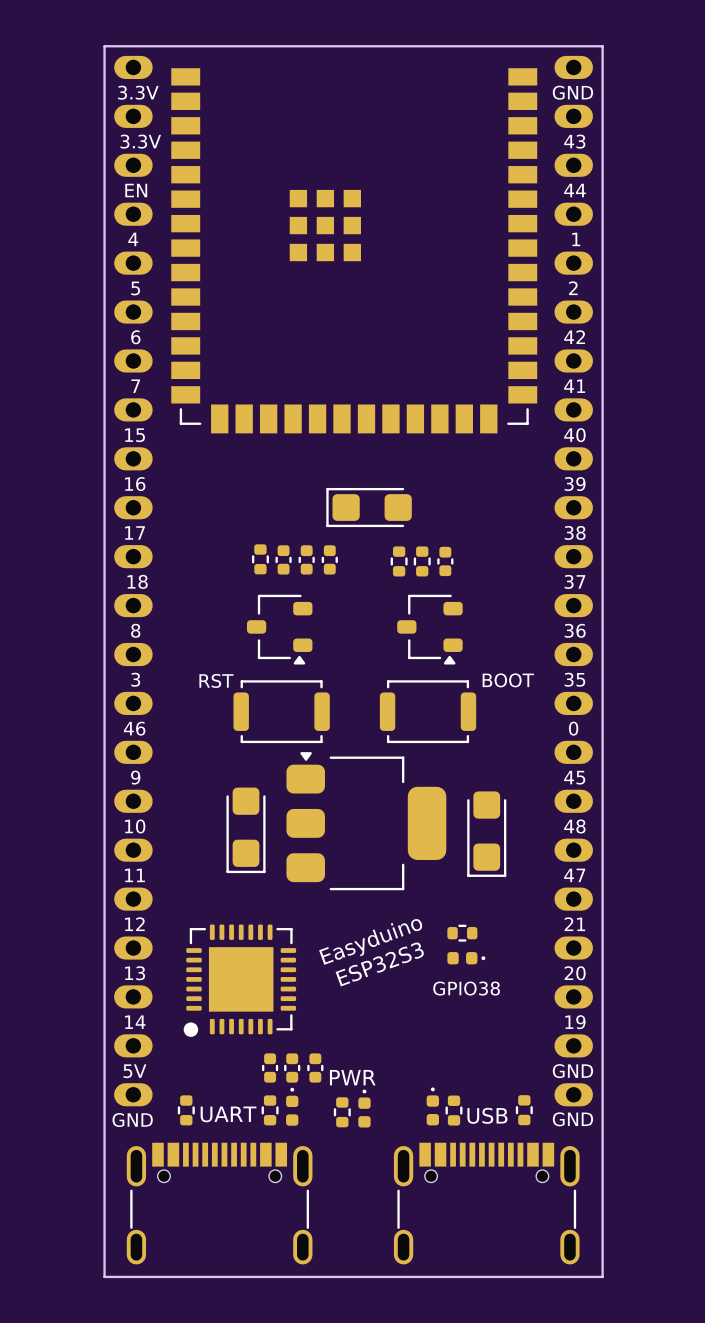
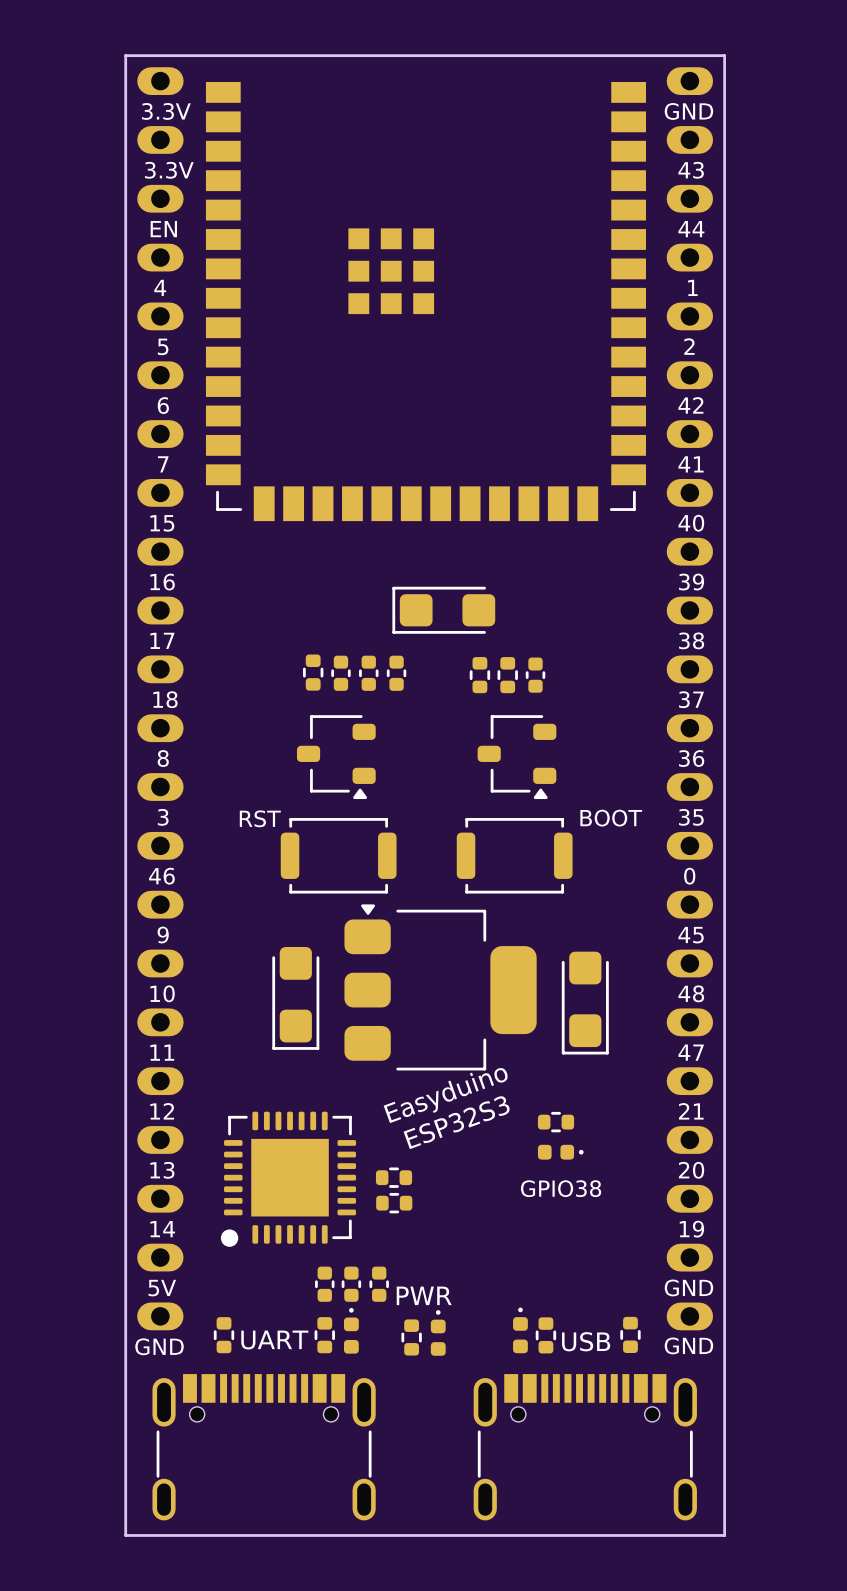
text: none -> Easyduino (445, 1095)
text: Easyduino (370, 941) -> ESP32S3 (456, 1122)
text: ESP32S3 (379, 964) -> none
part: none -> (394, 1177)
part: none -> (394, 1203)

